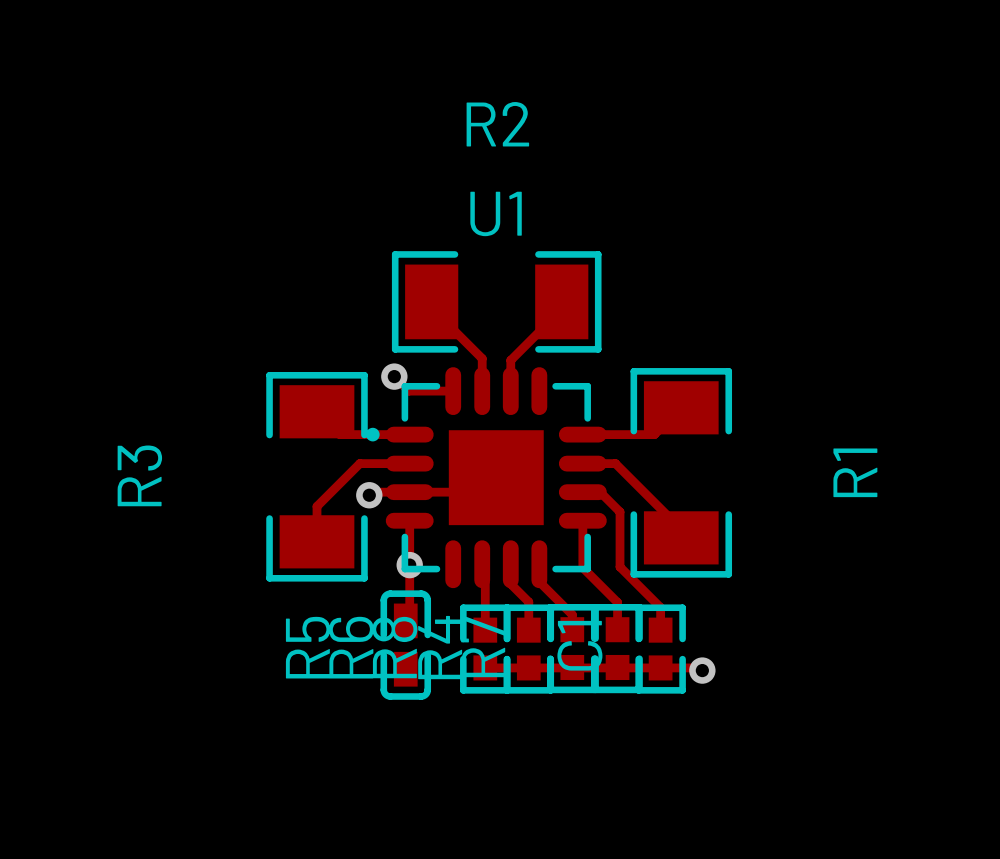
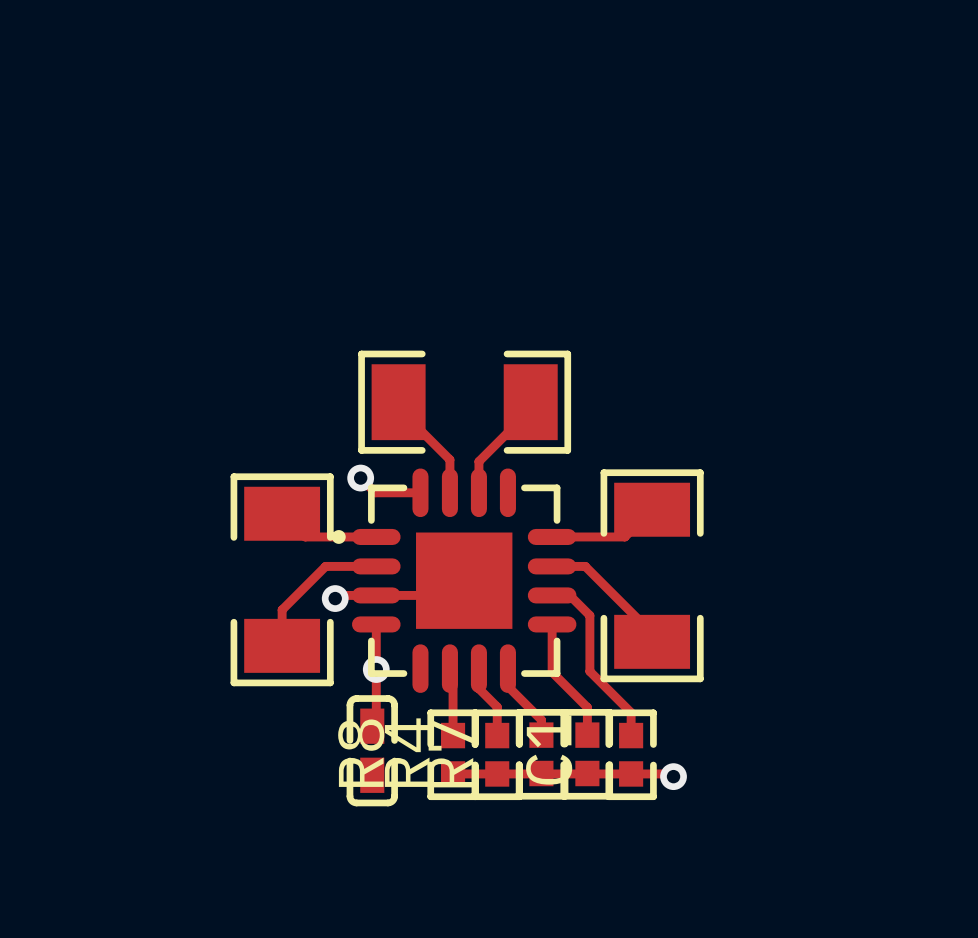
R2 name: R2 (497, 124) -> none
U1 name: U1 (496, 213) -> none
R1 name: R1 (855, 472) -> none
R3 name: R3 (139, 475) -> none
R5 name: R5 (308, 647) -> none
R6 name: R6 (351, 647) -> none

